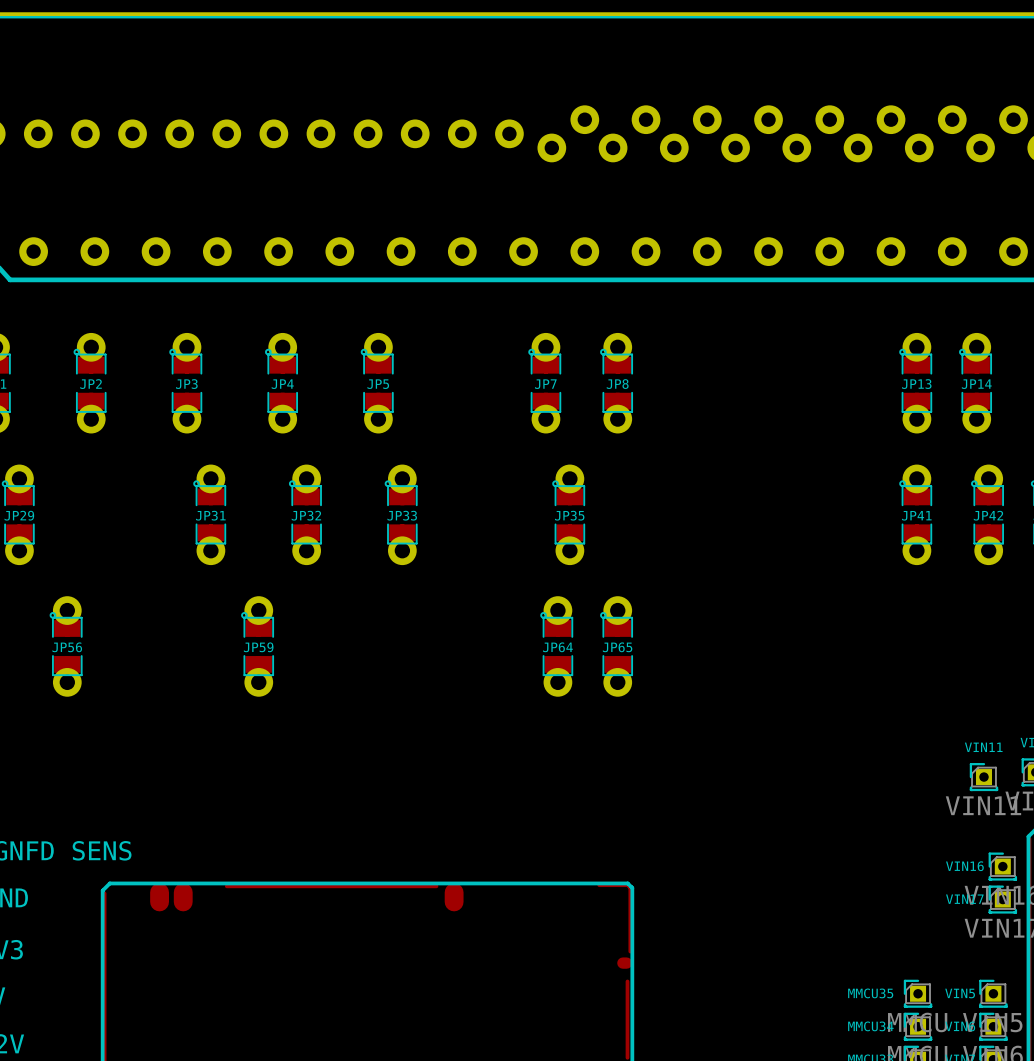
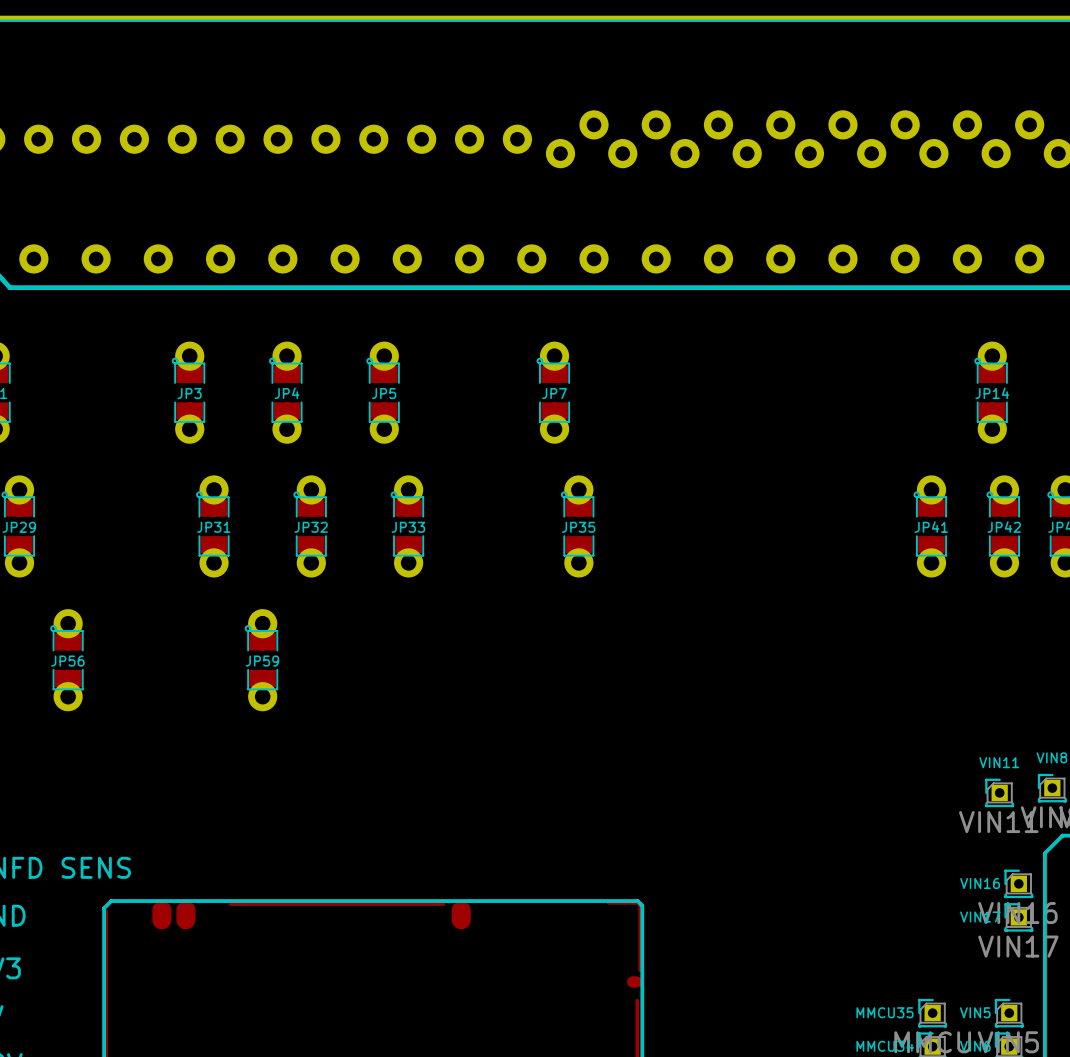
JP2: (90, 383) -> none
JP8: (616, 383) -> none
JP13: (915, 383) -> none
JP64: (556, 646) -> none
JP65: (616, 646) -> none

